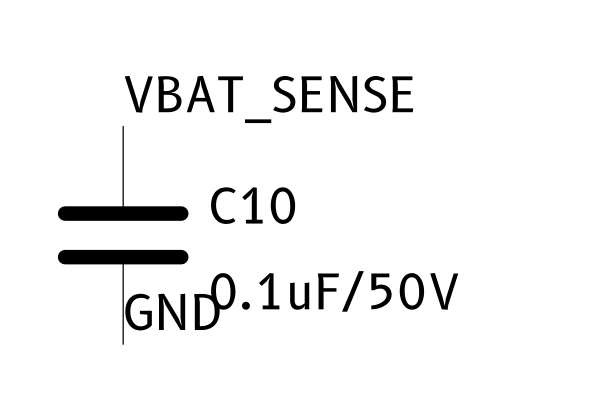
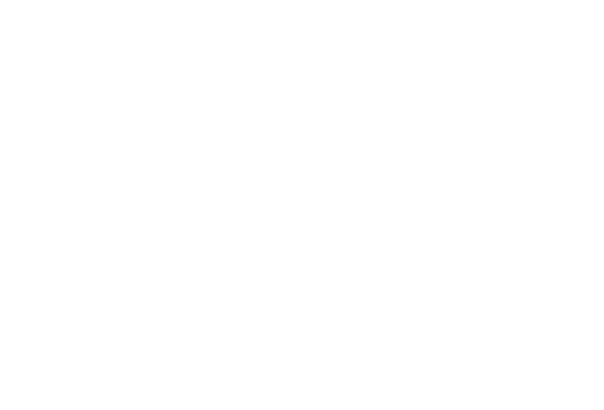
label: VBAT_SENSE (269, 99) -> none
C10: 0.1uF/50V (123, 235) -> none
label: GND (172, 312) -> none

